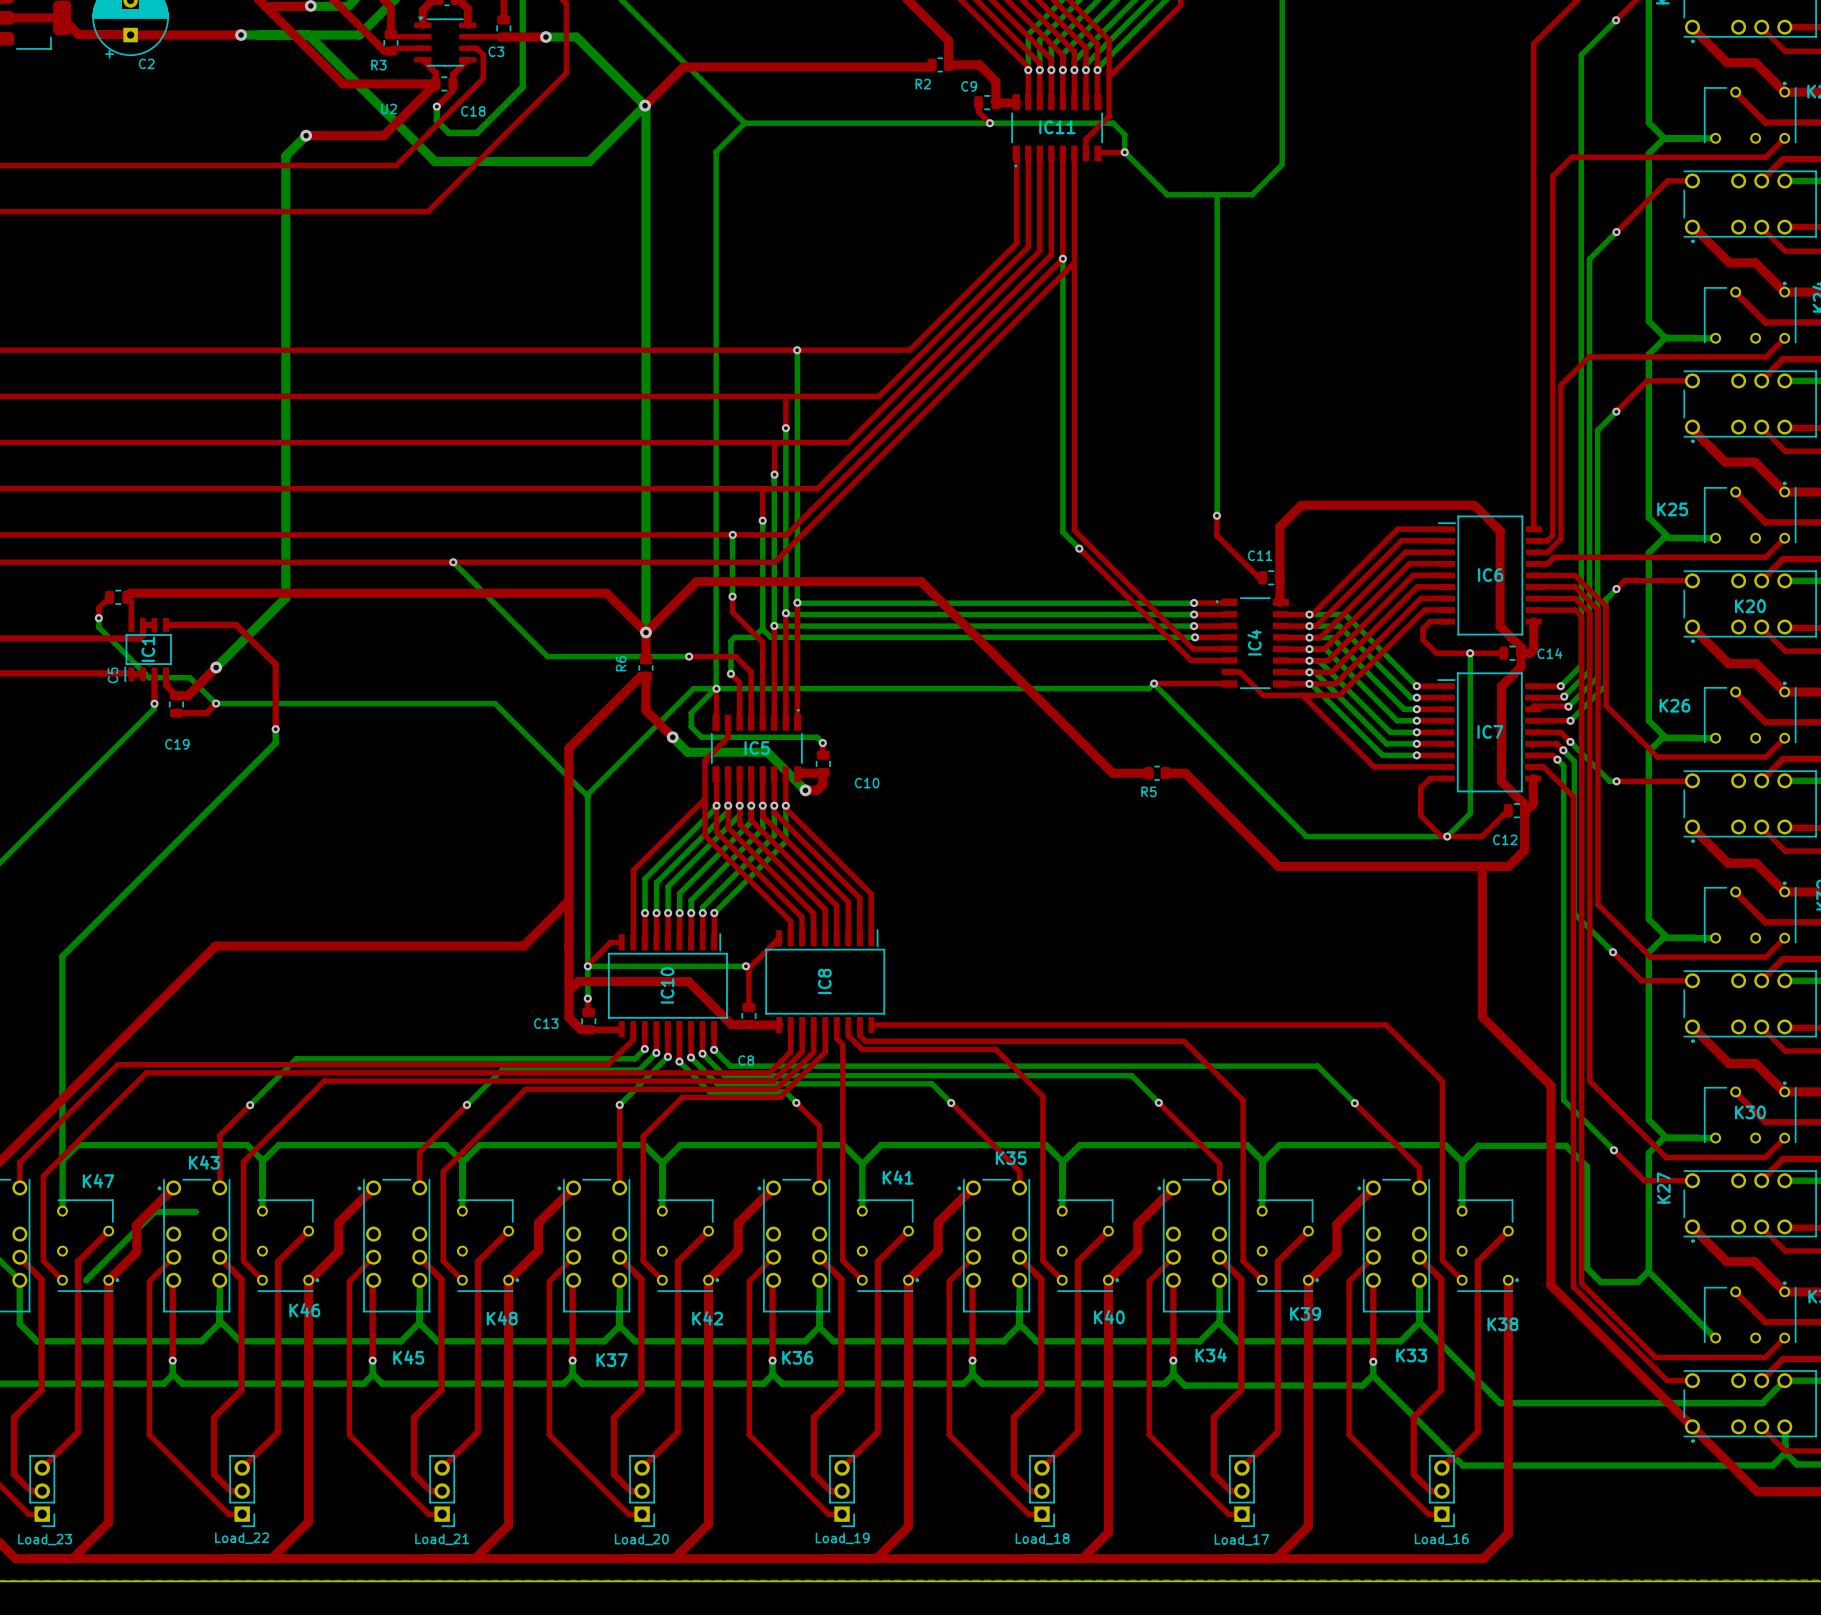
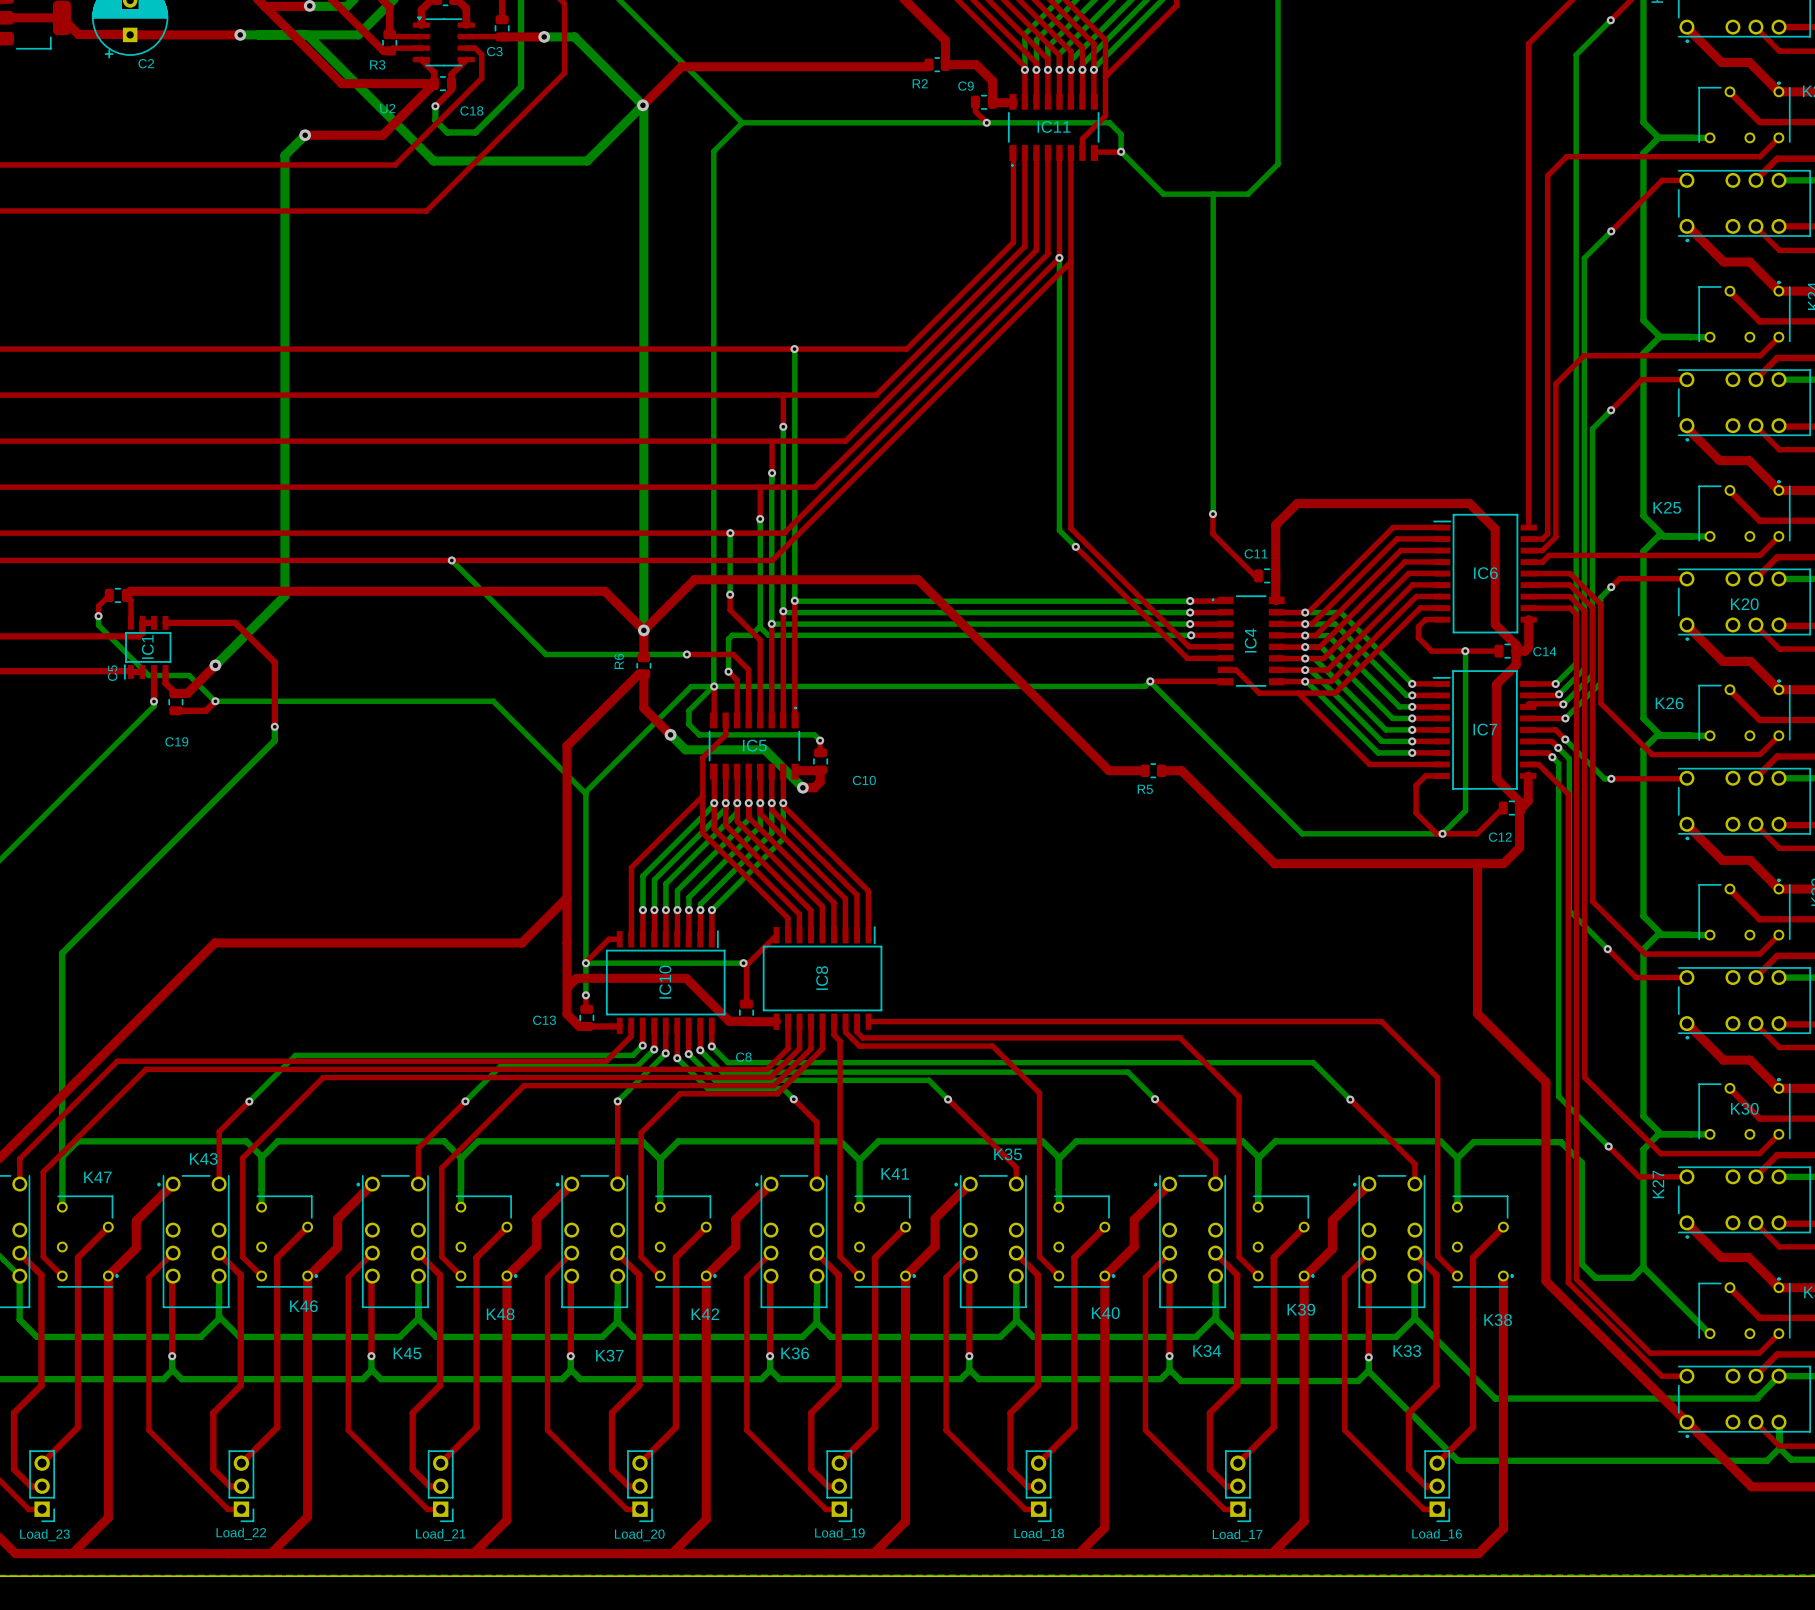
bottom track: (195, 1211) (154, 1211) (86, 1280) -> none

